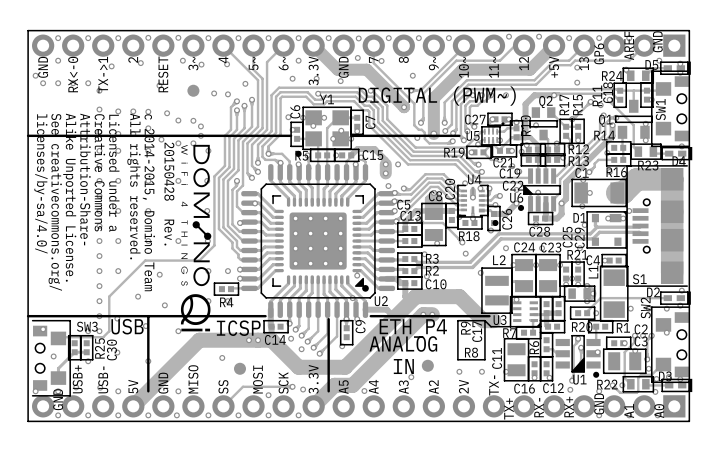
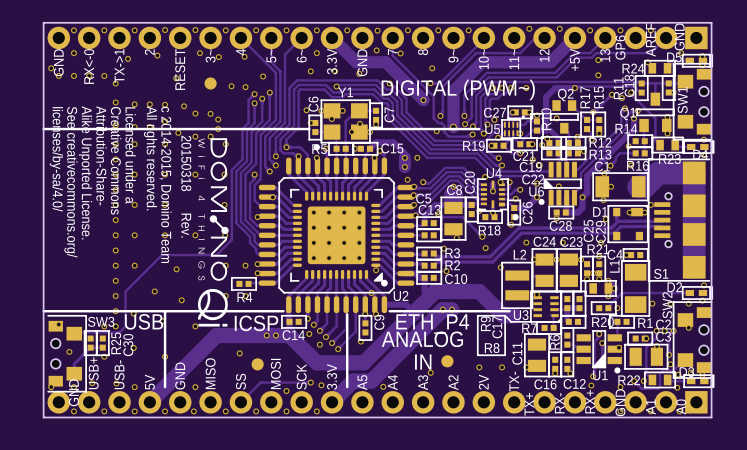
text: 20150428 (169, 171) -> 20150318 (186, 163)

